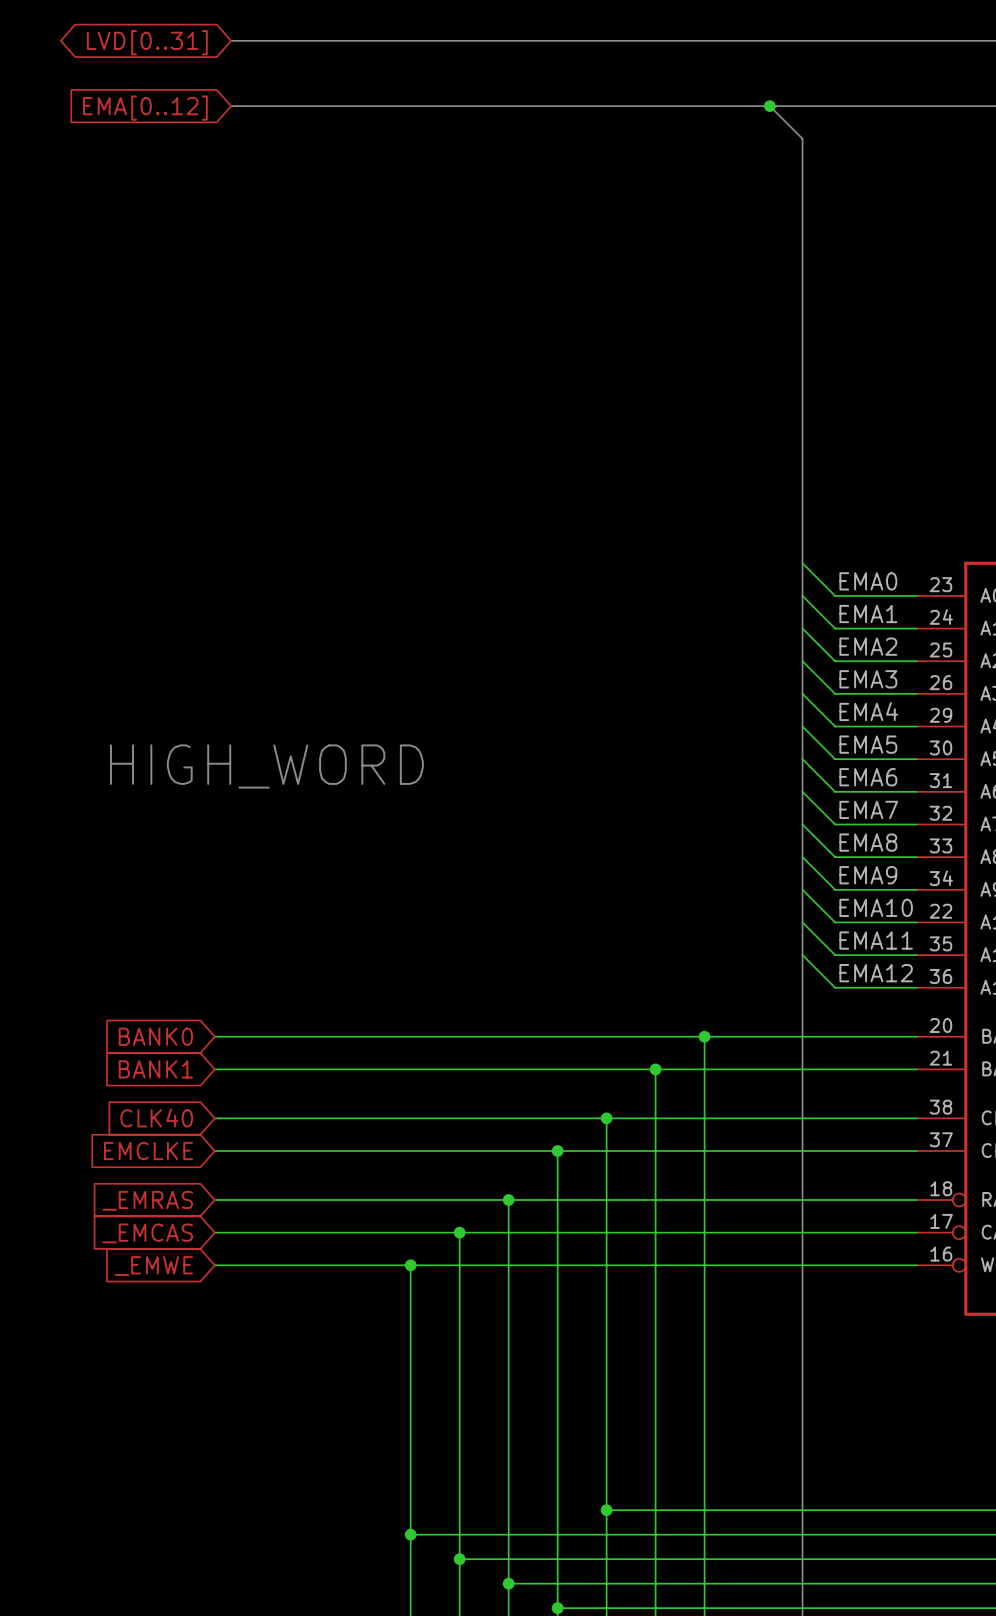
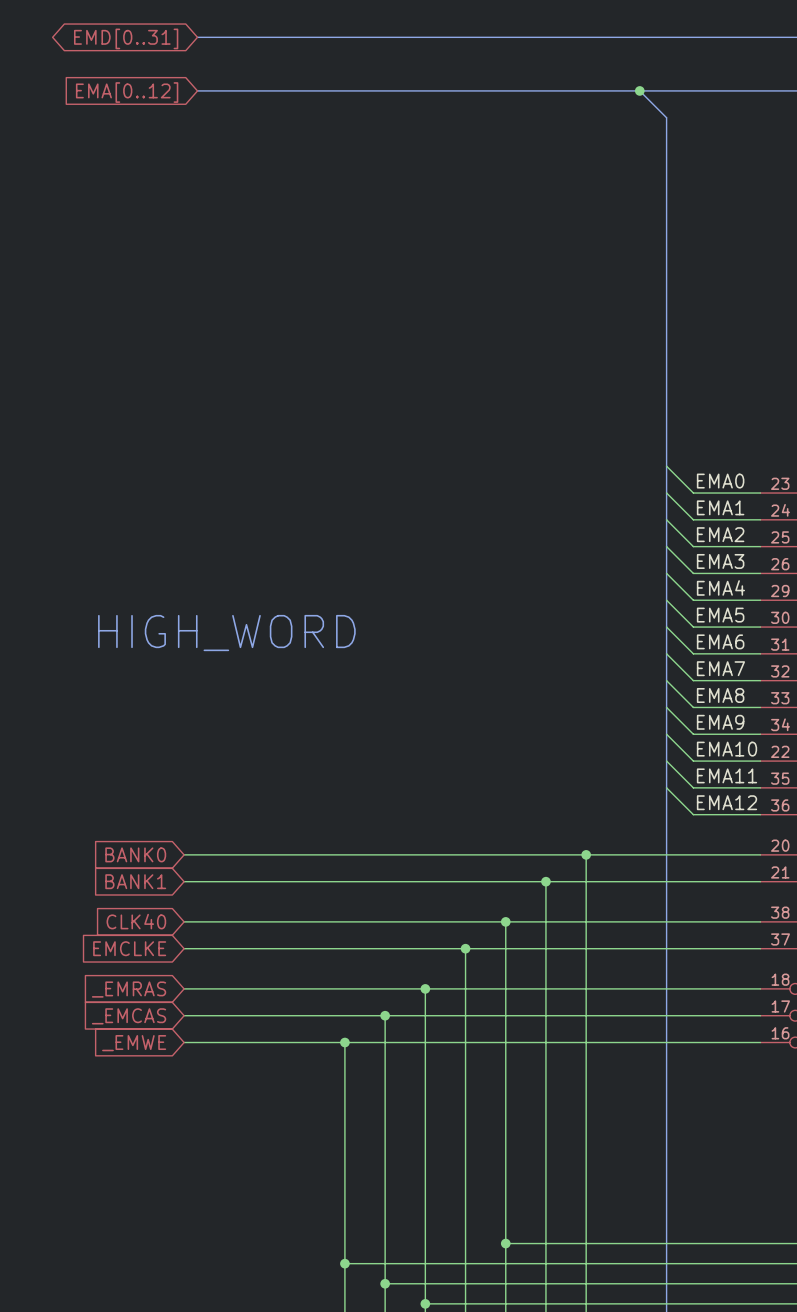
global label: LVD[0..31] (147, 42) -> EMD[0..31] (126, 38)

